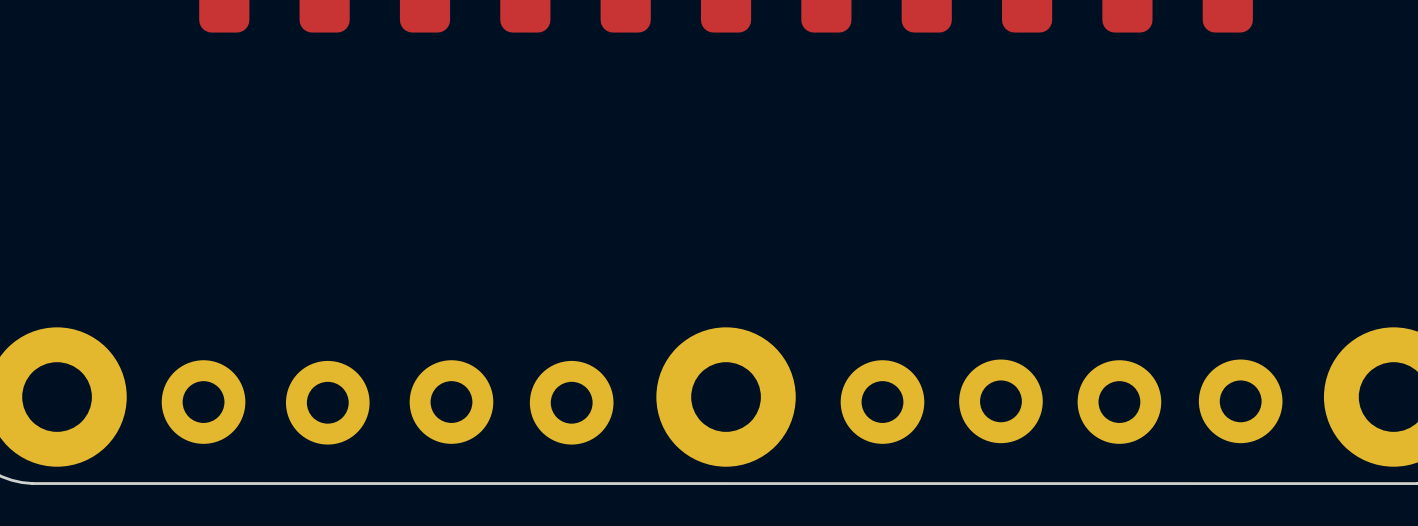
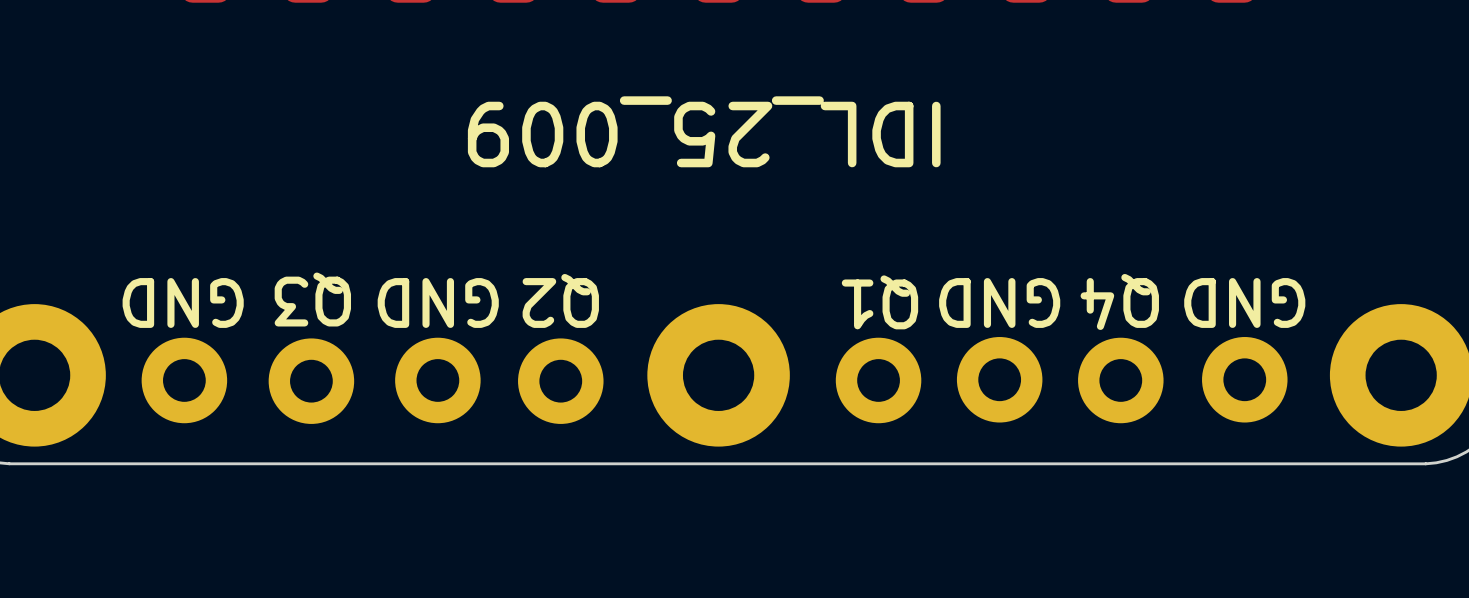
text: none -> IDL_25_009 (704, 131)
Q3 name: none -> Q3 (312, 299)
Q2 name: none -> Q2 (560, 300)
Q4 name: none -> Q4 (1119, 301)
Q1 name: none -> Q1 (879, 302)
text: none -> GND (183, 302)
text: none -> GND (438, 302)
text: none -> GND (999, 302)
text: none -> GND (1244, 302)

